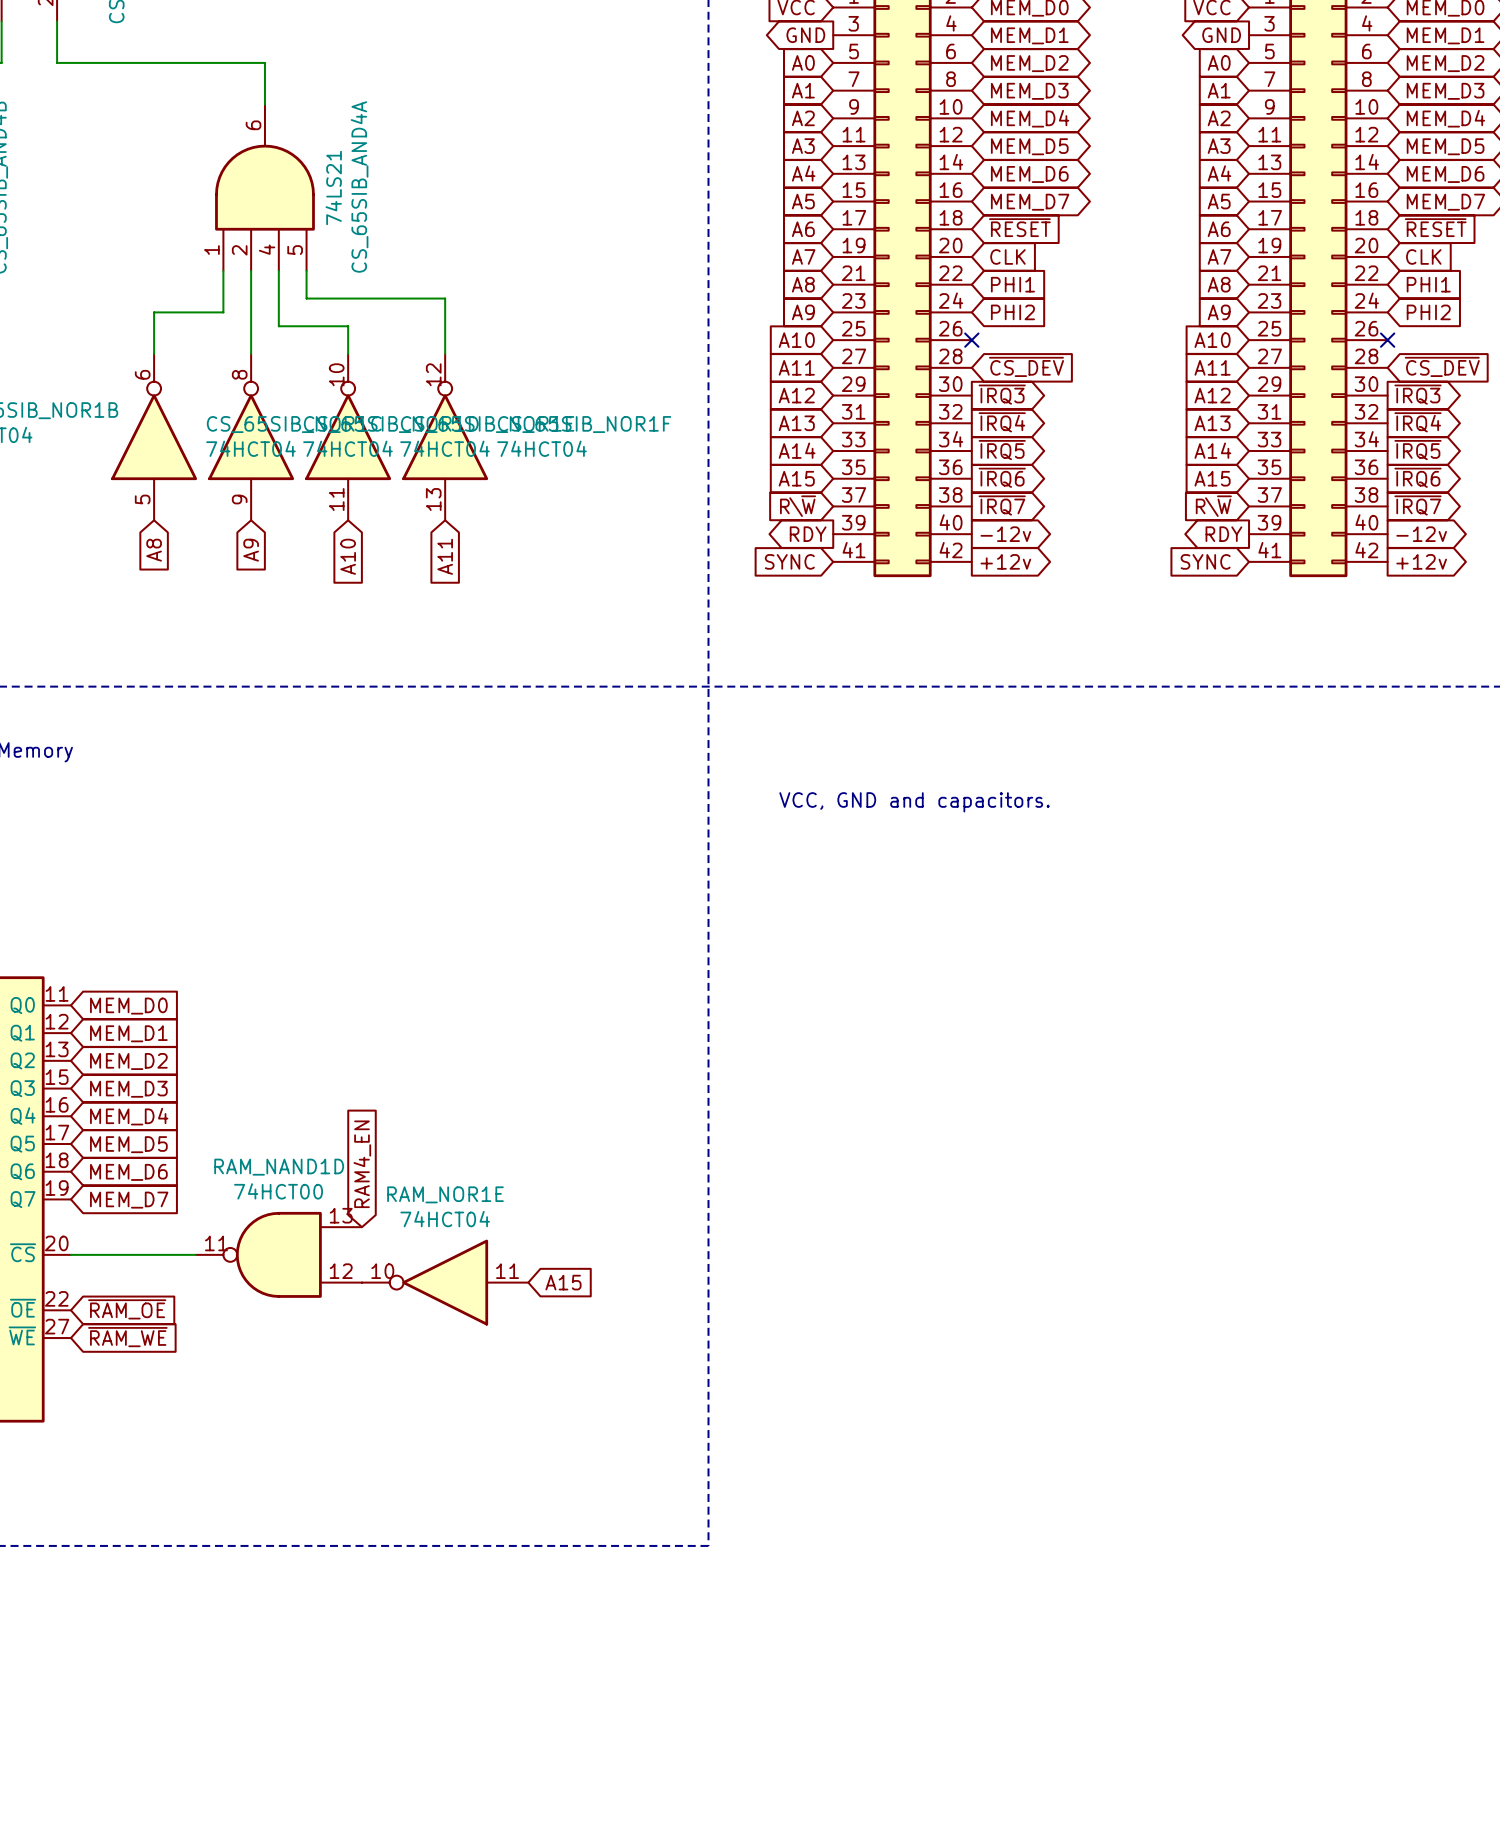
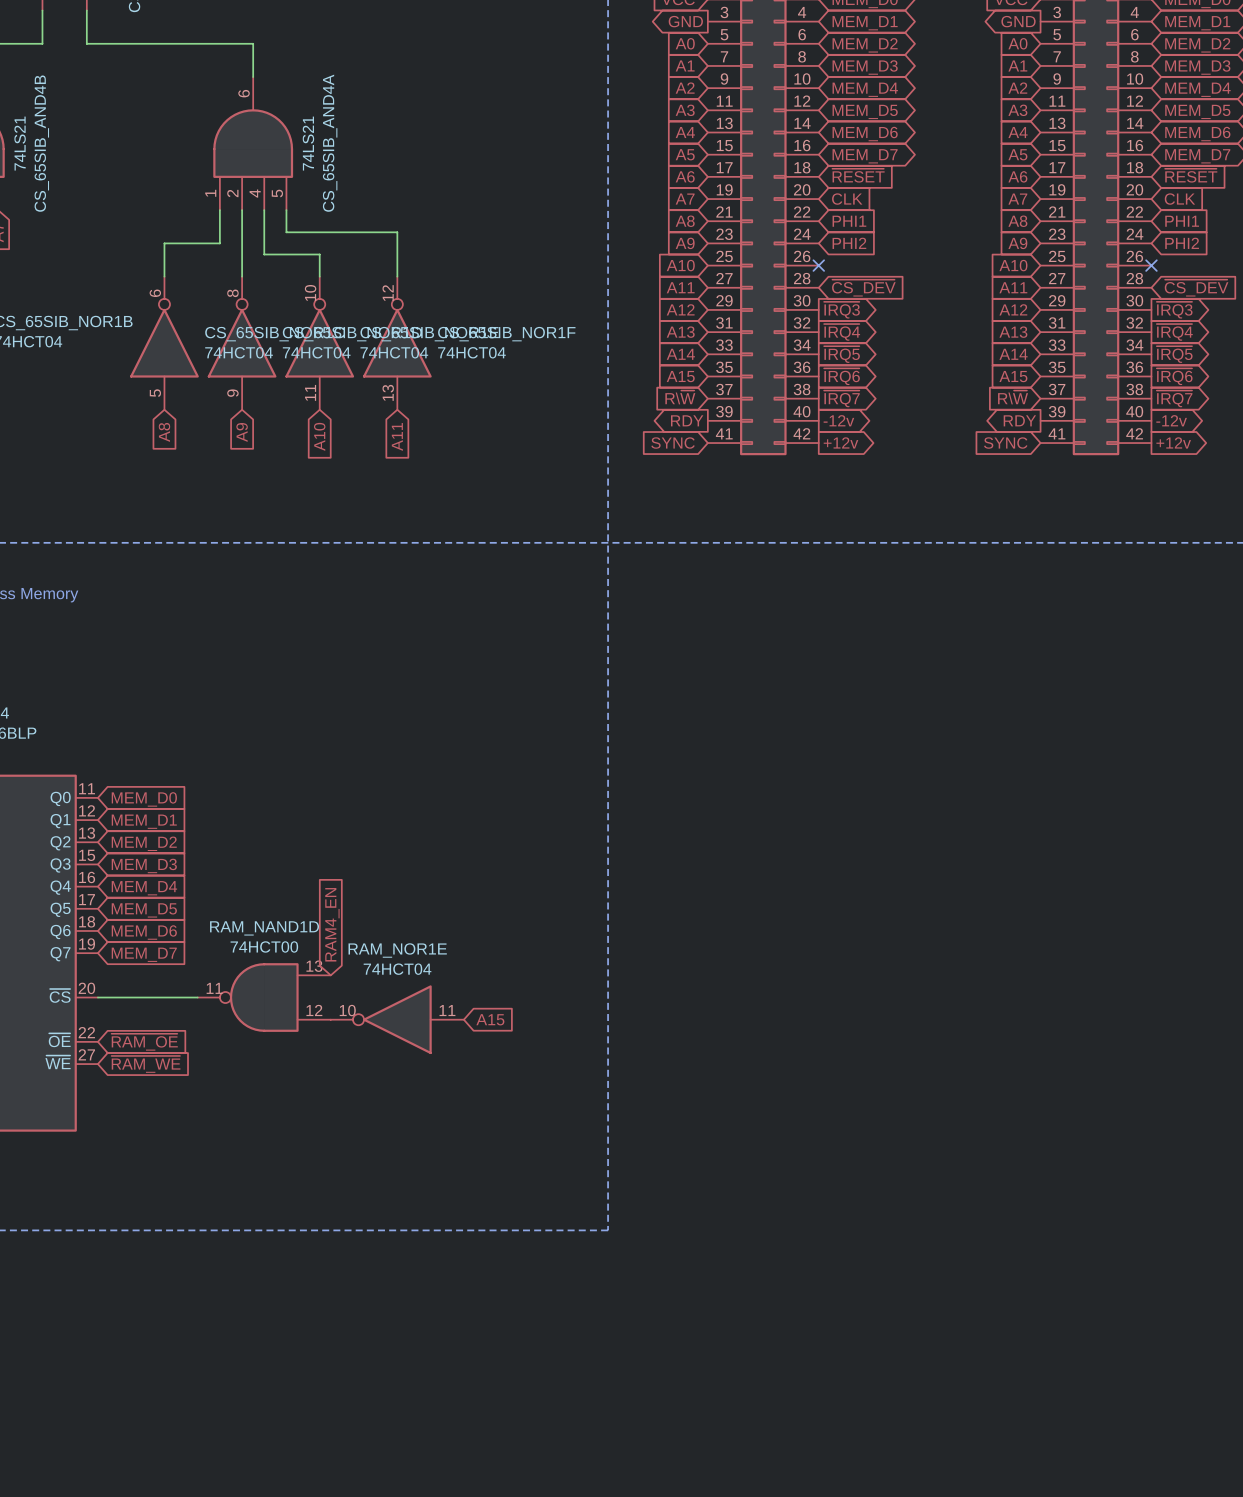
text: VCC, GND and capacitors. (914, 802) -> none

